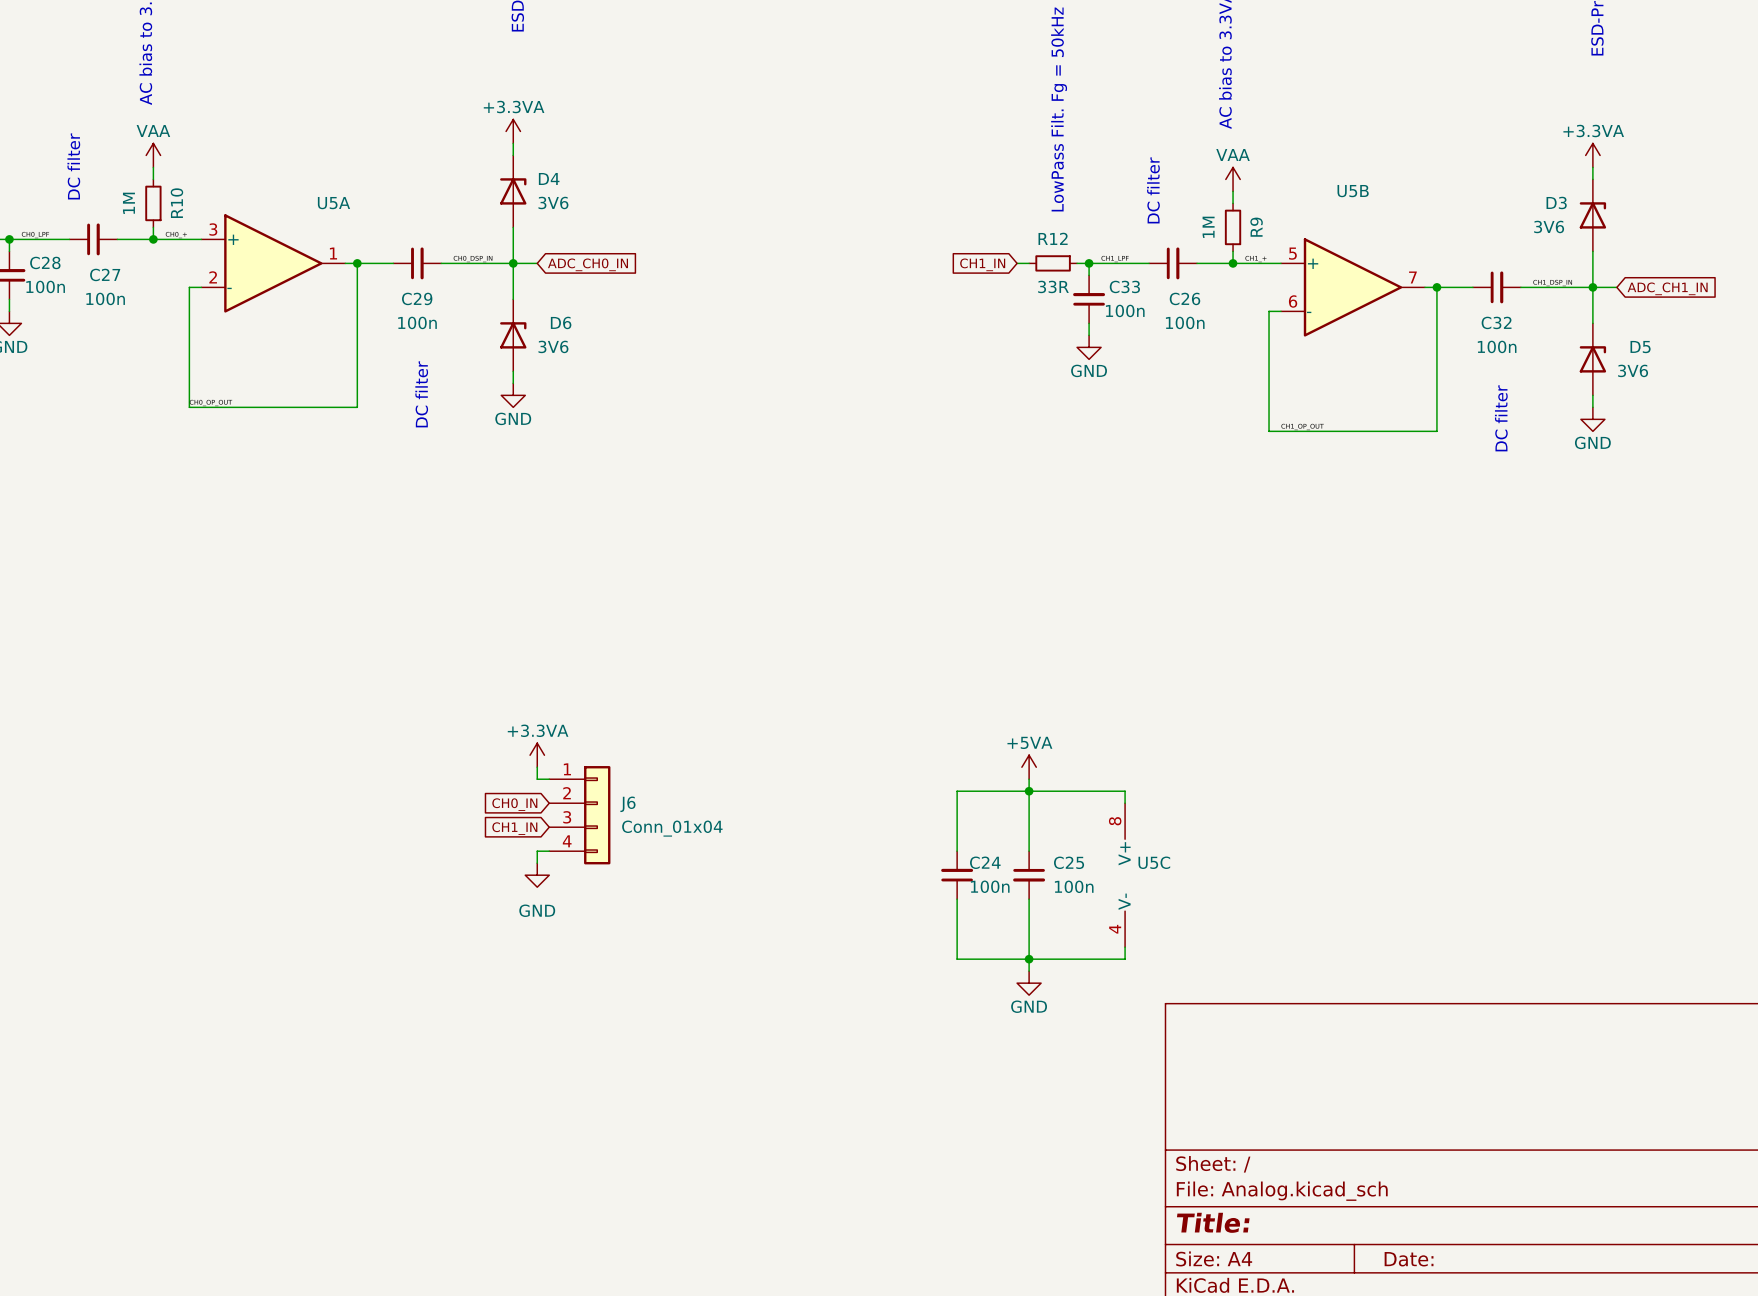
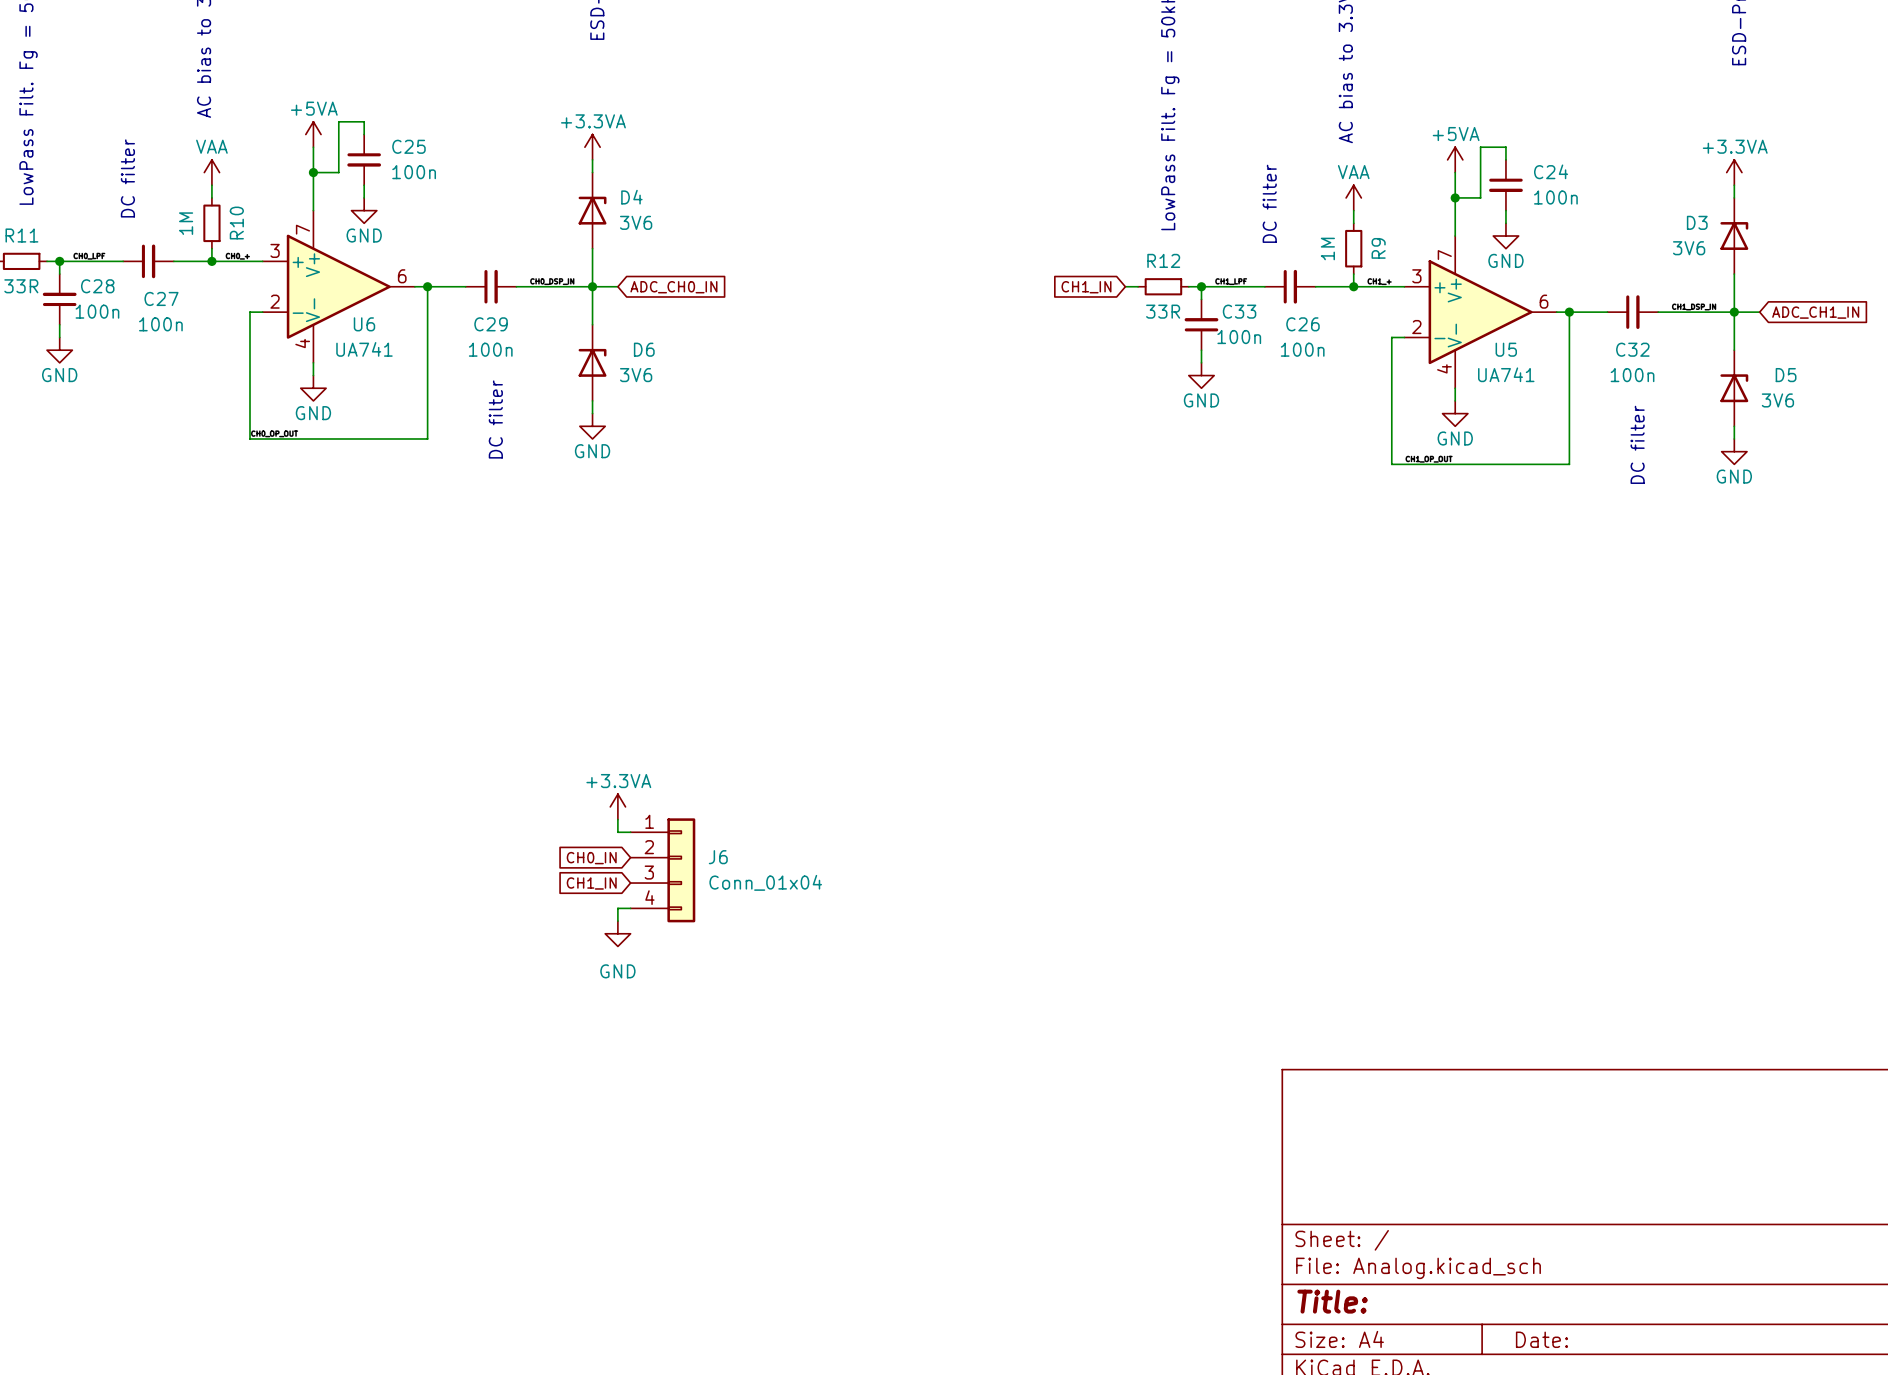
power symbol: none -> +5VA (313, 134)
wire: none -> (364, 134) (364, 121) (338, 121) (338, 172) (313, 172)
wire: none -> (313, 147) (313, 210)
power symbol: none -> +5VA (1455, 159)
wire: none -> (1505, 159) (1505, 147) (1480, 147) (1480, 197) (1455, 197)
junction: none -> (313, 172)
wire: none -> (1455, 172) (1455, 236)
wire: none -> (364, 185) (364, 197)
junction: none -> (1455, 197)
power symbol: none -> GND (364, 210)
wire: none -> (1505, 210) (1505, 223)
power symbol: none -> GND (1505, 236)
U5A: (273, 263) -> none
U6: none -> UA741 (338, 286)
U5B: (1352, 287) -> none
U5: none -> UA741 (1480, 312)
wire: none -> (313, 362) (313, 375)
power symbol: none -> GND (313, 388)
wire: none -> (1455, 388) (1455, 400)
power symbol: none -> GND (1455, 413)
power symbol: +5VA (1029, 767) -> none
wire: (1029, 779) (1029, 851) -> none
junction: (1029, 791) -> none
wire: (1125, 803) (1125, 791) (957, 791) (957, 851) -> none
C24 rotation: 0° (957, 875) -> 180° (1505, 185)
C24 position: (957, 875) -> (1505, 185)
C25 position: (1029, 875) -> (364, 159)
U5C: (1125, 875) -> none
wire: (957, 899) (957, 959) (1125, 959) (1125, 947) -> none
wire: (1029, 899) (1029, 971) -> none
junction: (1029, 959) -> none
power symbol: GND (1029, 983) -> none

